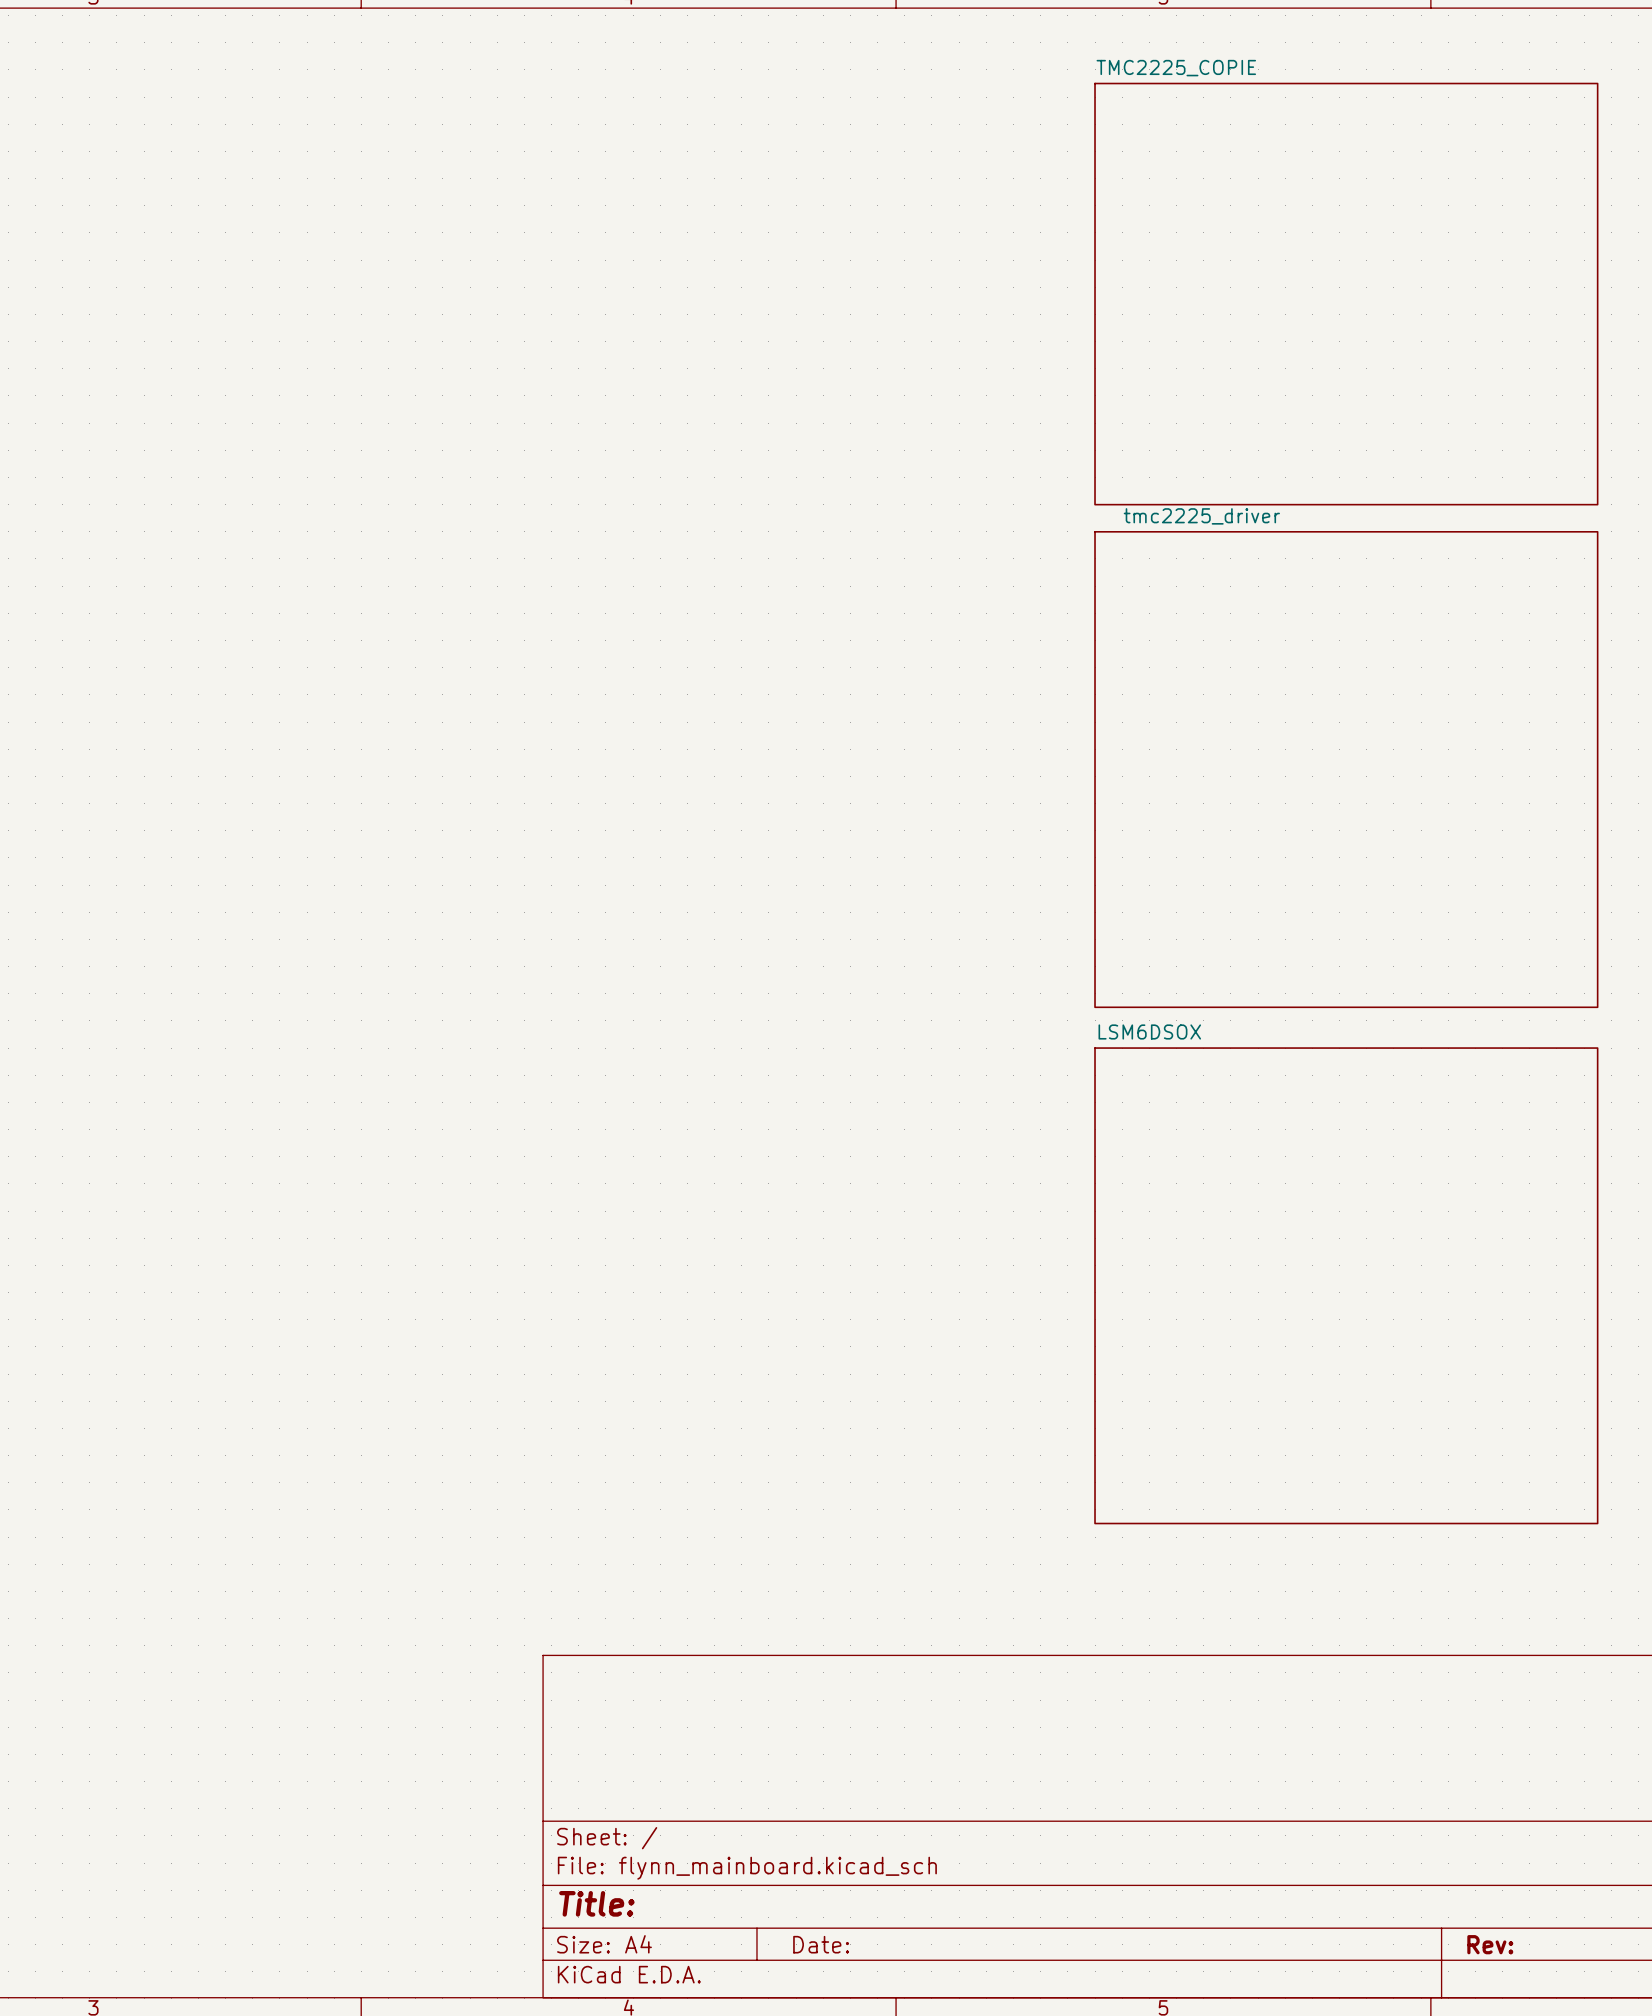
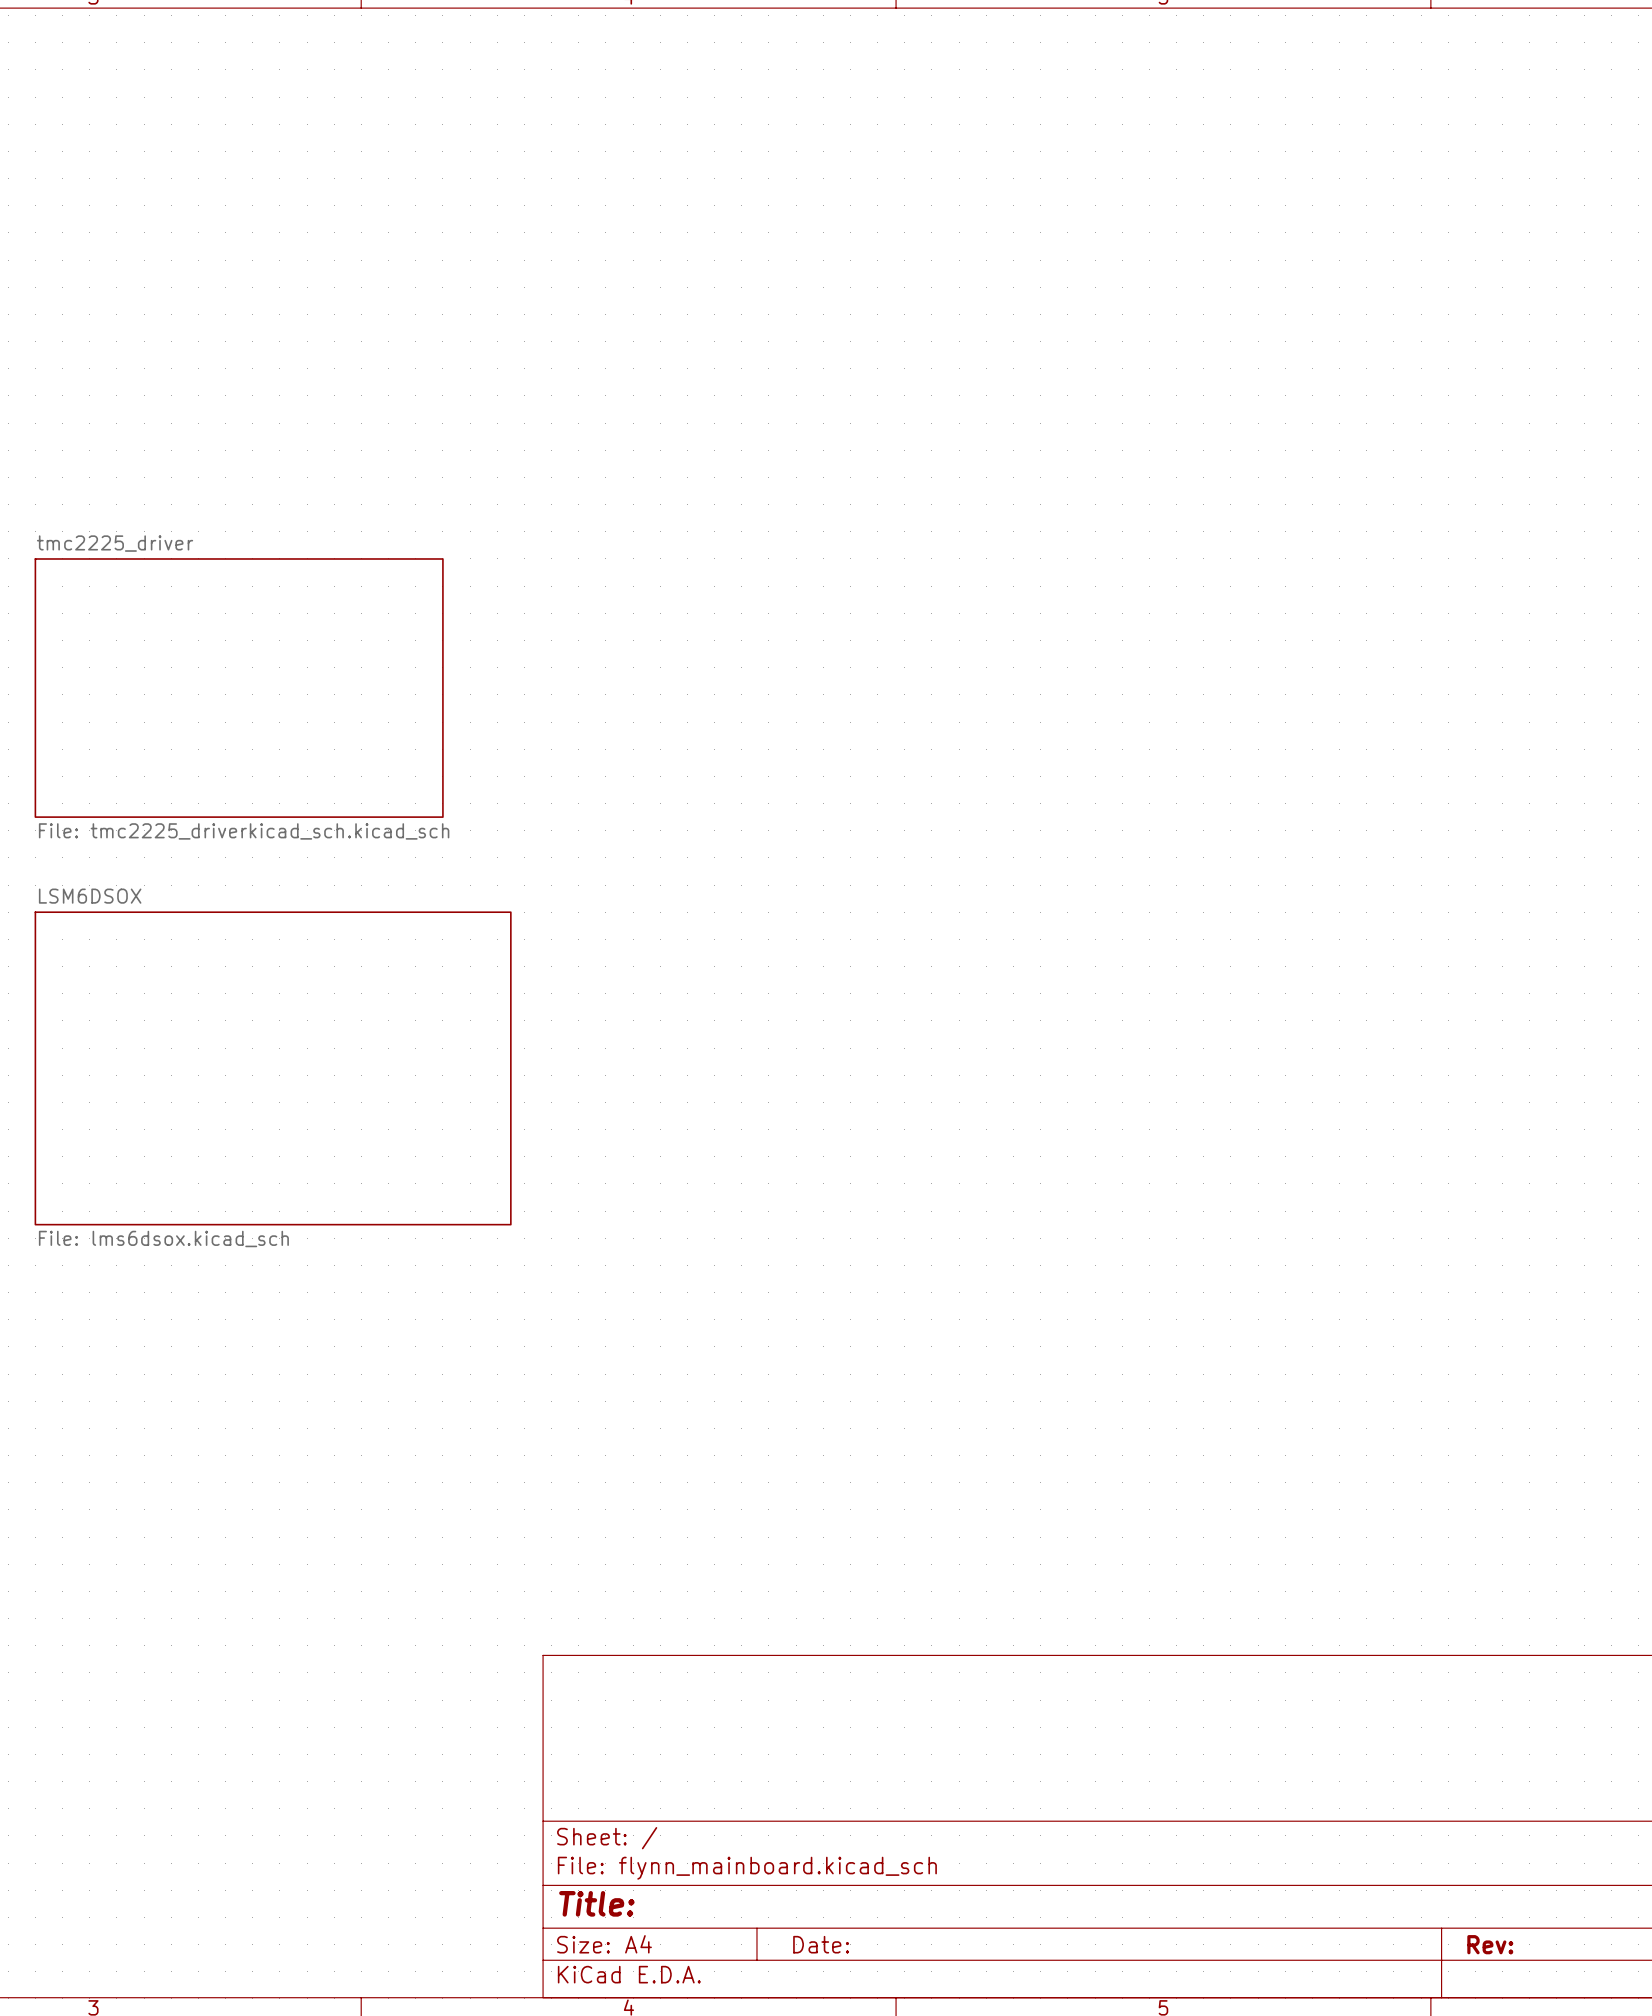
sheet TMC2225_COPIE: (1346, 294) -> none
sheet tmc2225_driver name position: tmc2225_driver (1201, 516) -> tmc2225_driver (115, 543)
sheet tmc2225_driver shape: [1094, 531, 1599, 1009] -> [34, 558, 444, 818]
sheet tmc2225_driver value: none -> File: tmc2225_driverkicad_sch.kicad_sch (244, 831)
sheet LSM6DSOX name position: LSM6DSOX (1149, 1031) -> LSM6DSOX (90, 896)
sheet LSM6DSOX shape: [1094, 1047, 1599, 1525] -> [34, 911, 512, 1226]
sheet LSM6DSOX value: none -> File: lms6dsox.kicad_sch (163, 1238)

